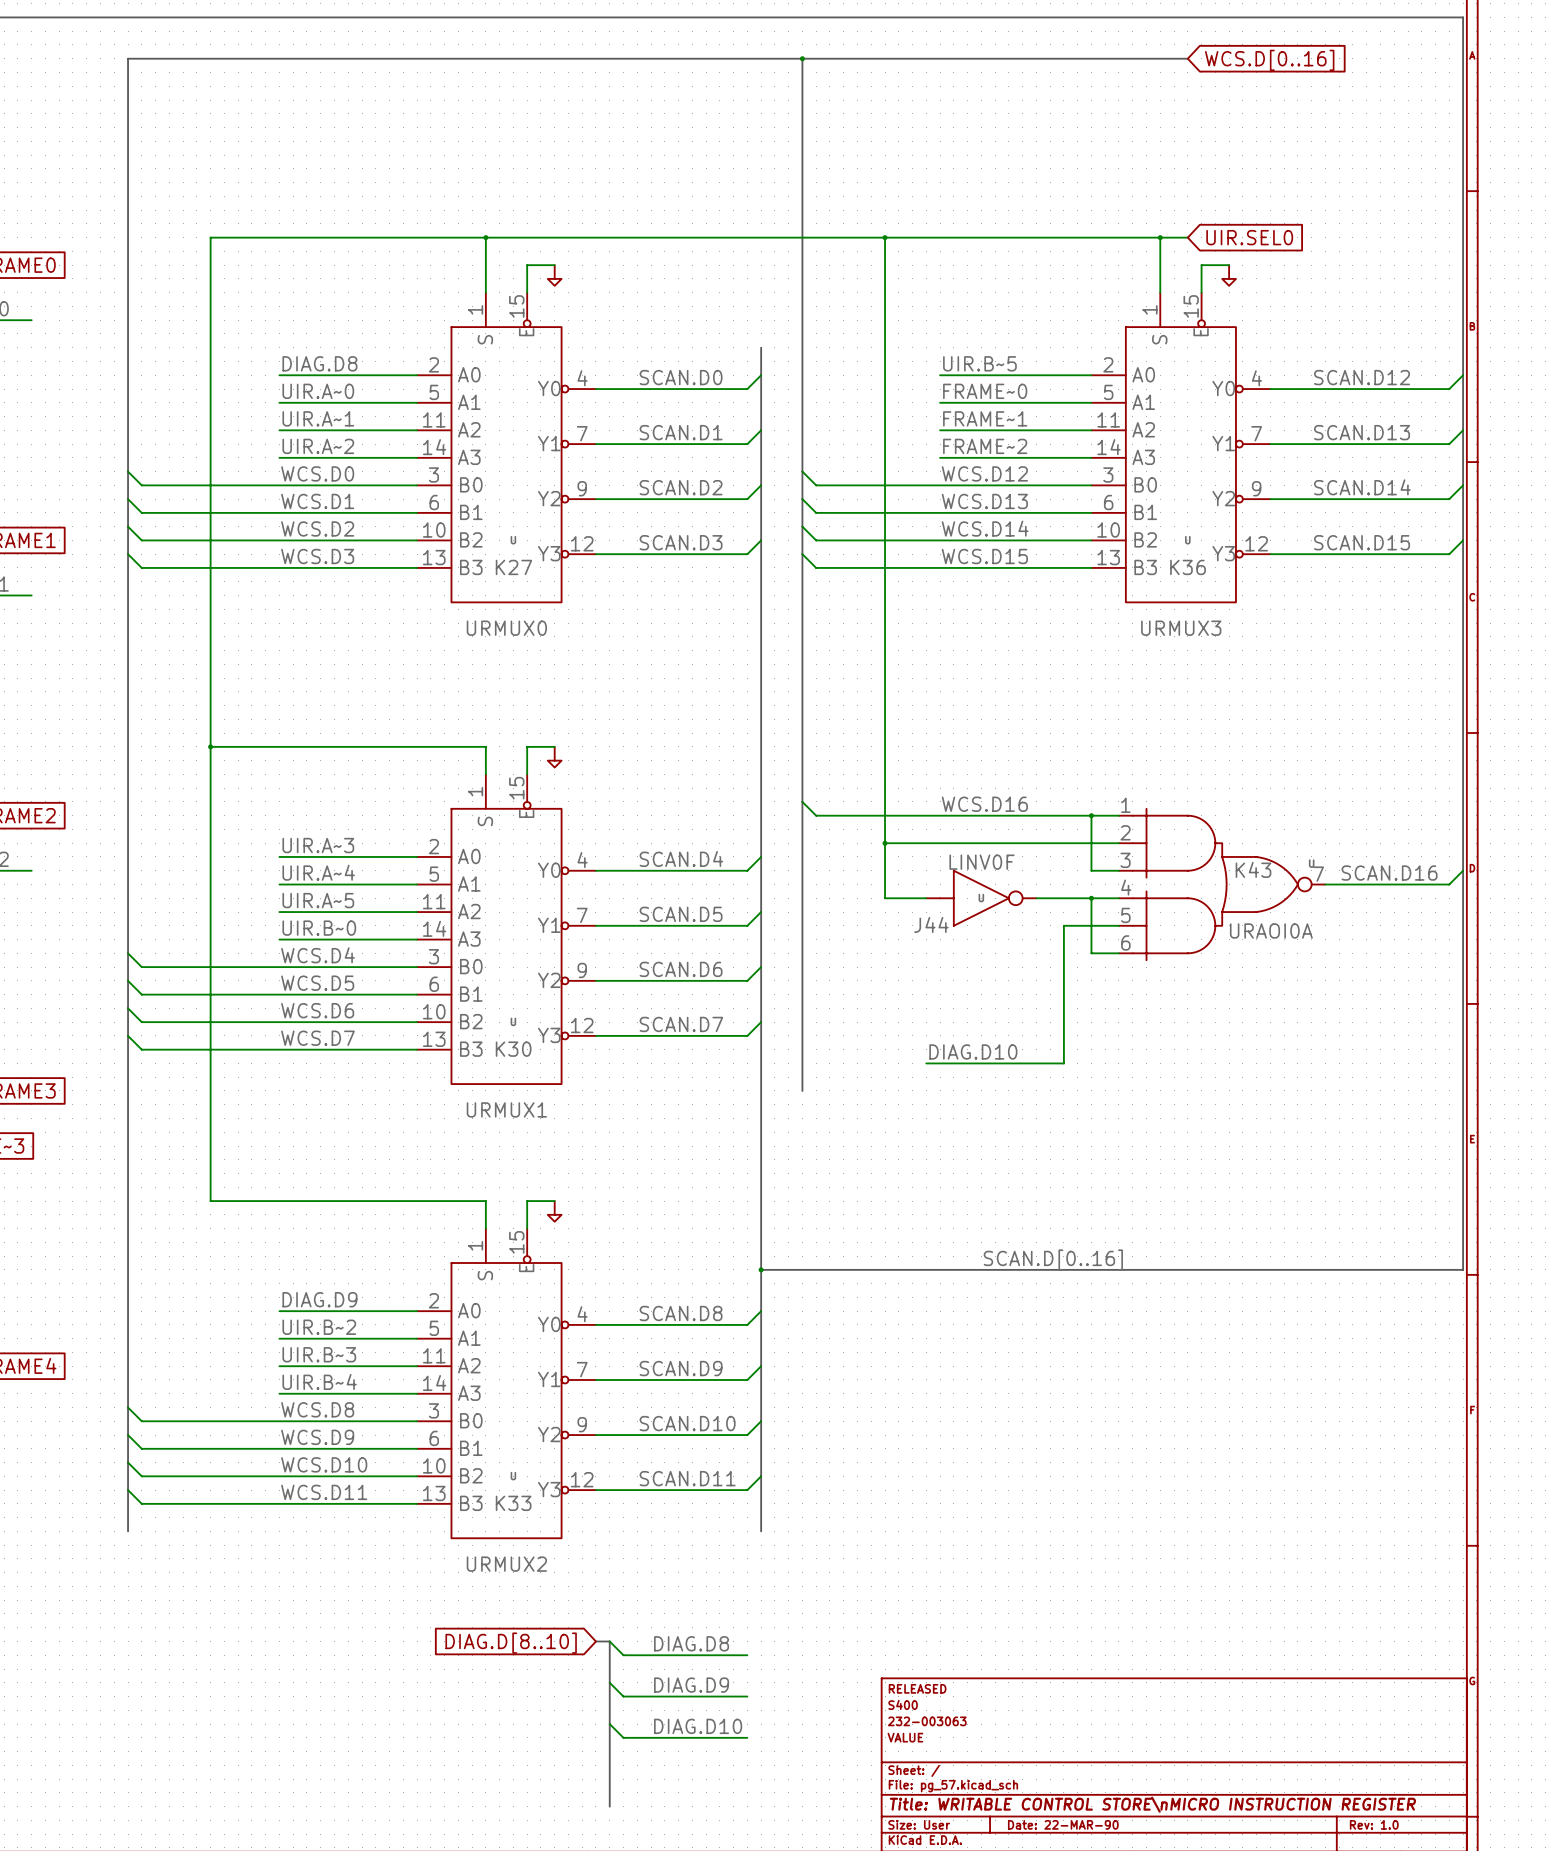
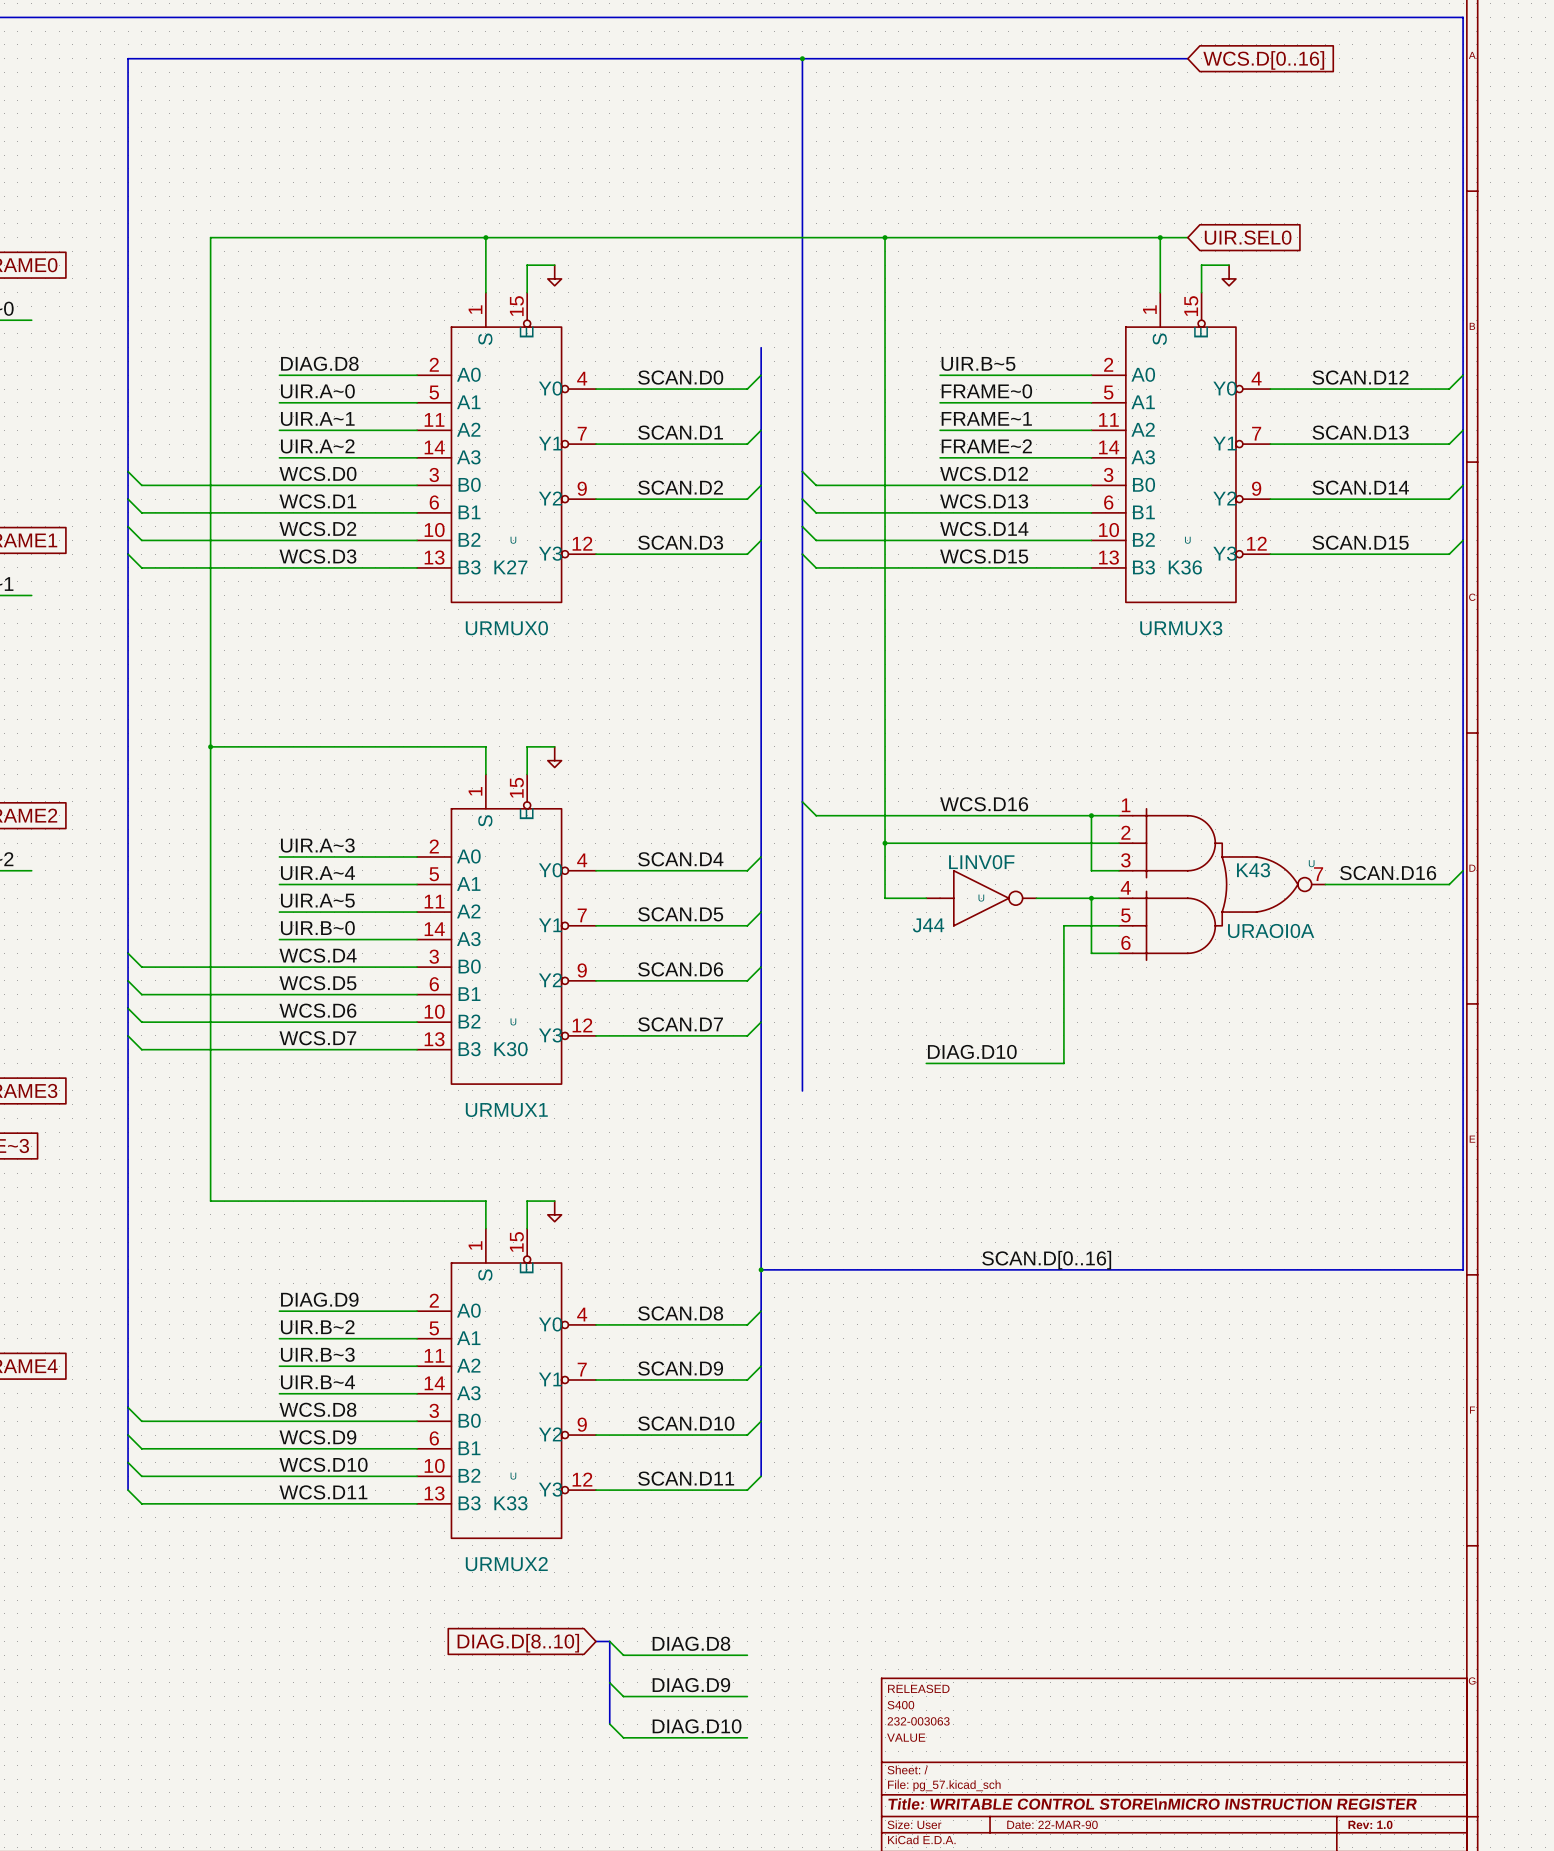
bus: (761, 1476) (761, 1531) -> none
bus: (128, 1490) (128, 1531) -> none
bus: (609, 1724) (609, 1806) -> none

